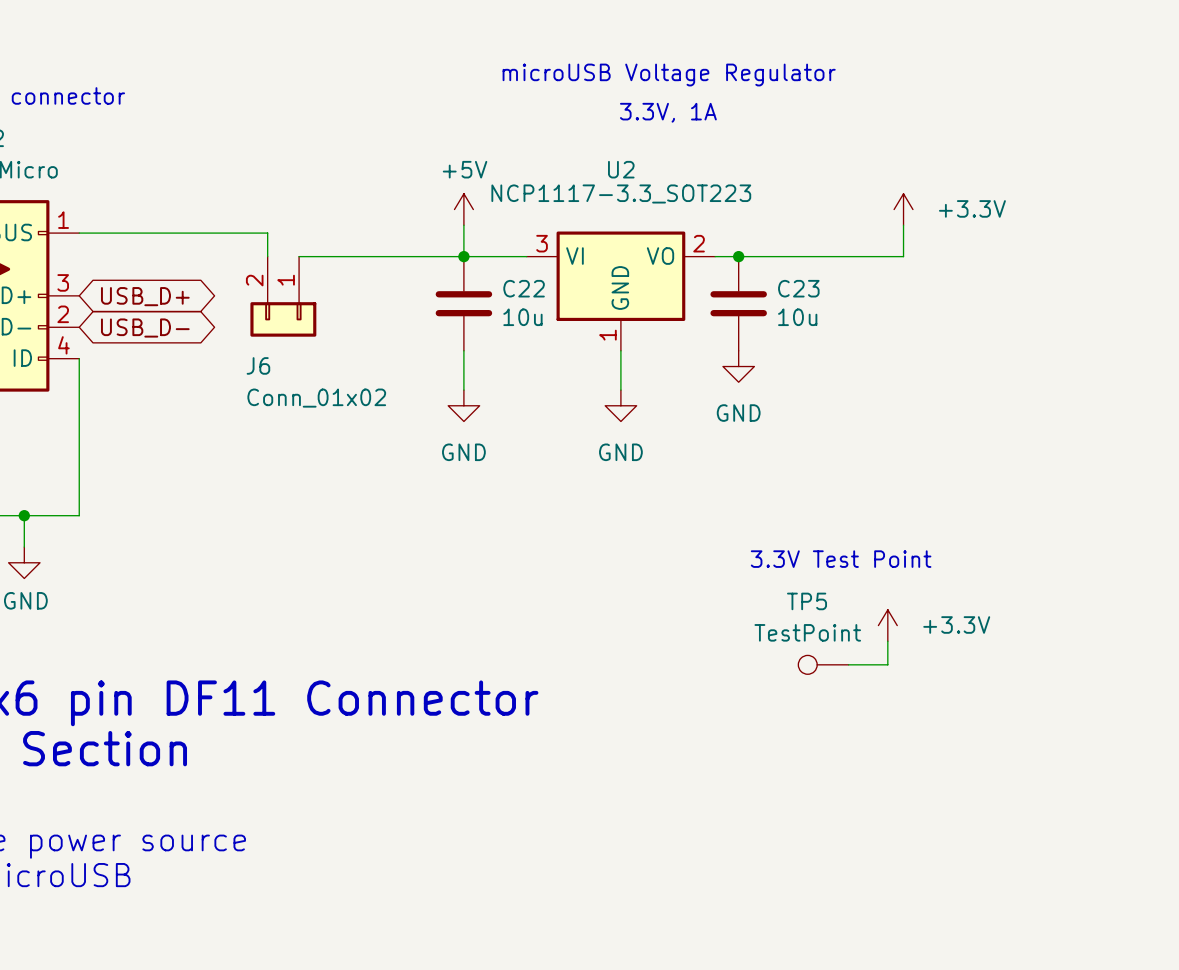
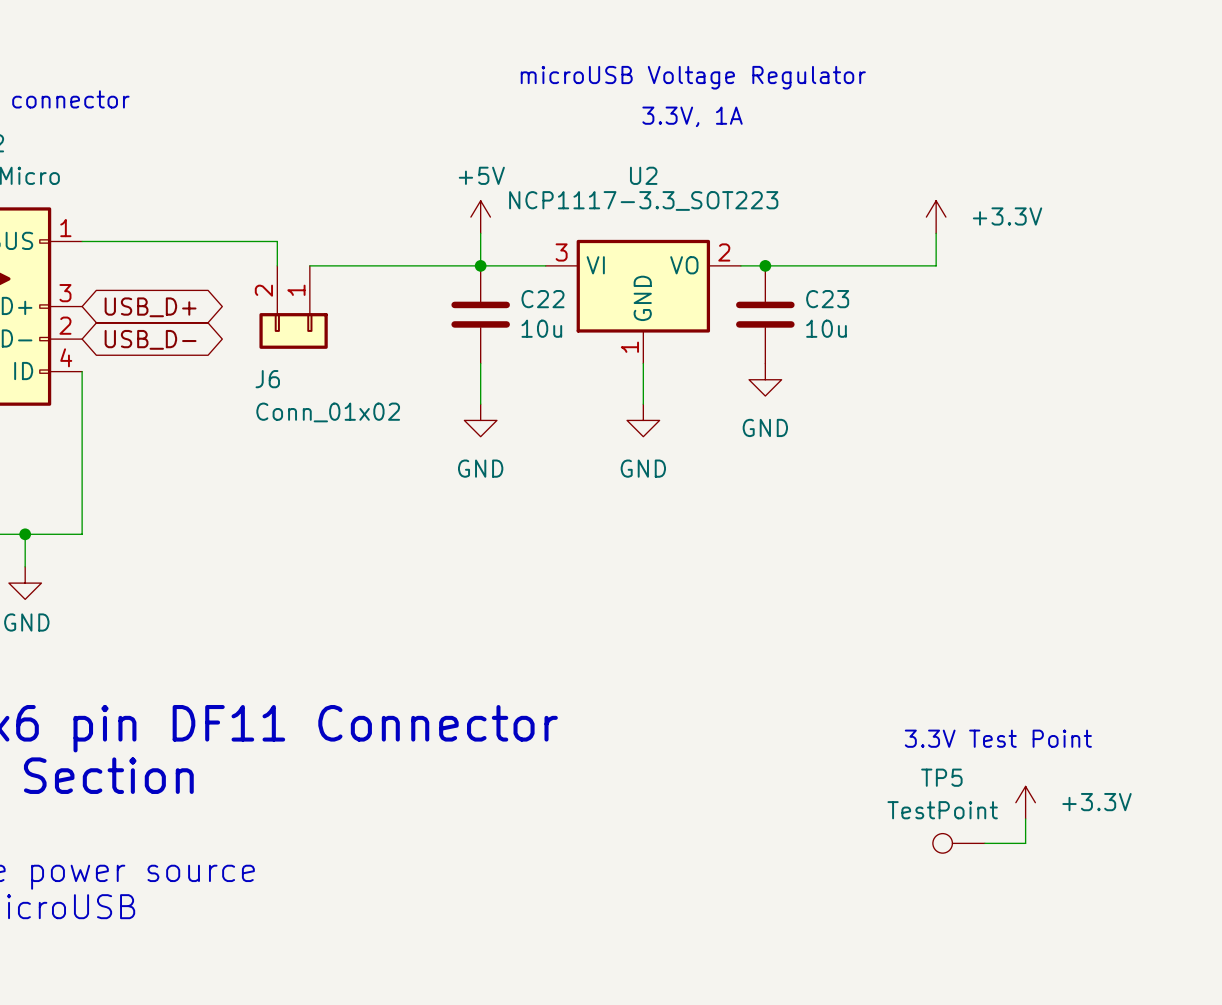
text position: 3.3V Test Point (841, 559) -> 3.3V Test Point (998, 738)
power symbol position: +3.3V (887, 625) -> +3.3V (1025, 802)
wire: (887, 641) (887, 664) (848, 664) -> (1025, 818) (1025, 843) (984, 843)
TP5 position: (823, 664) -> (958, 843)

